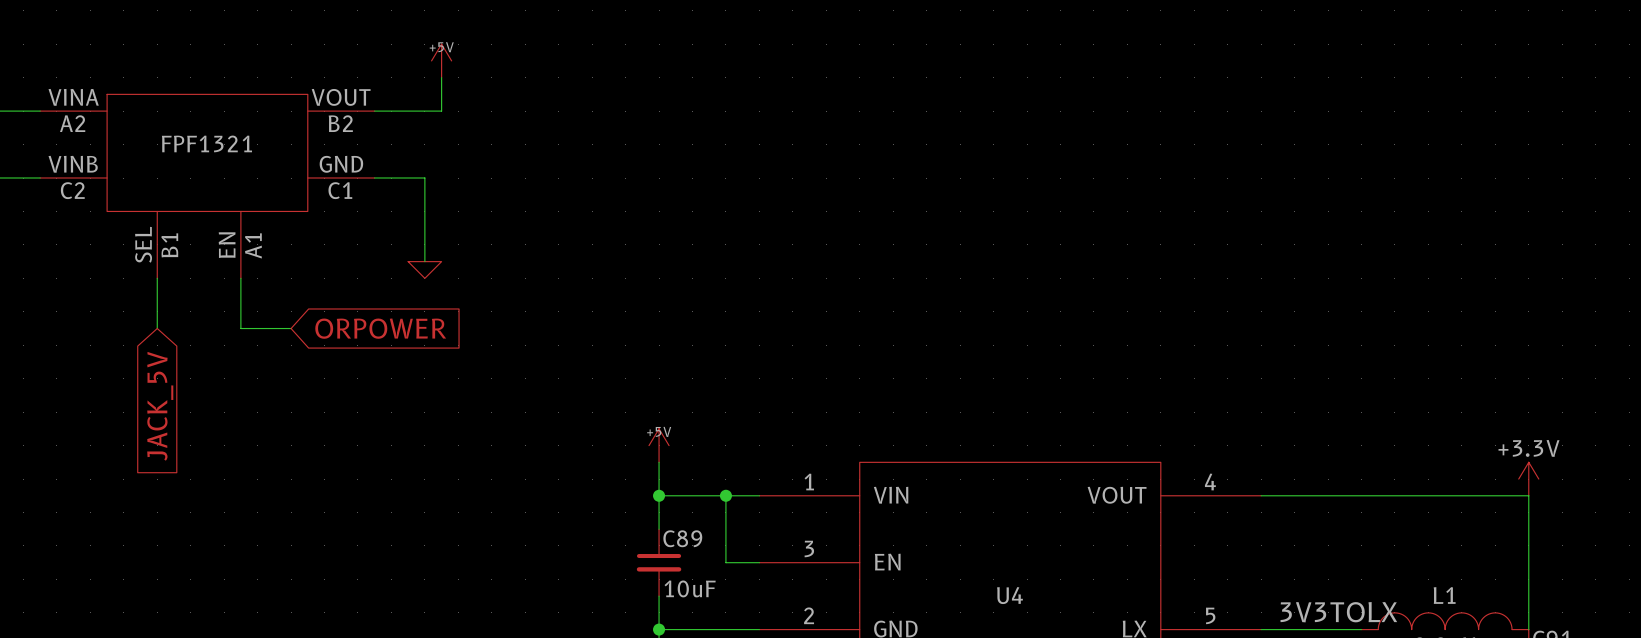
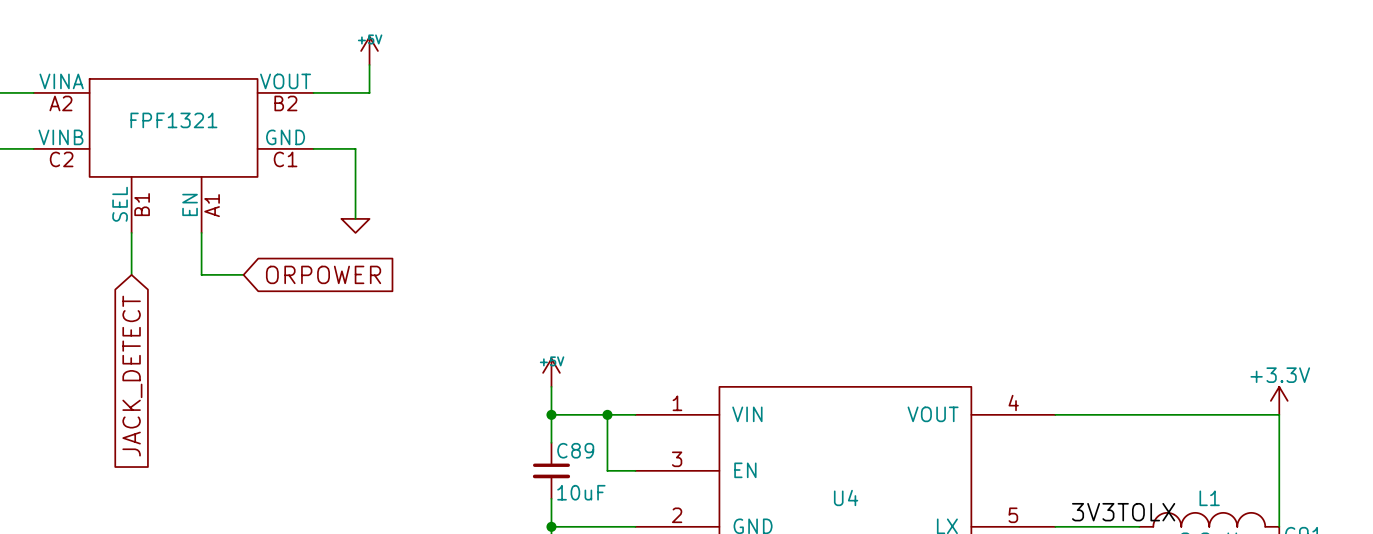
global label: JACK_5V (160, 406) -> JACK_DETECT (132, 376)

